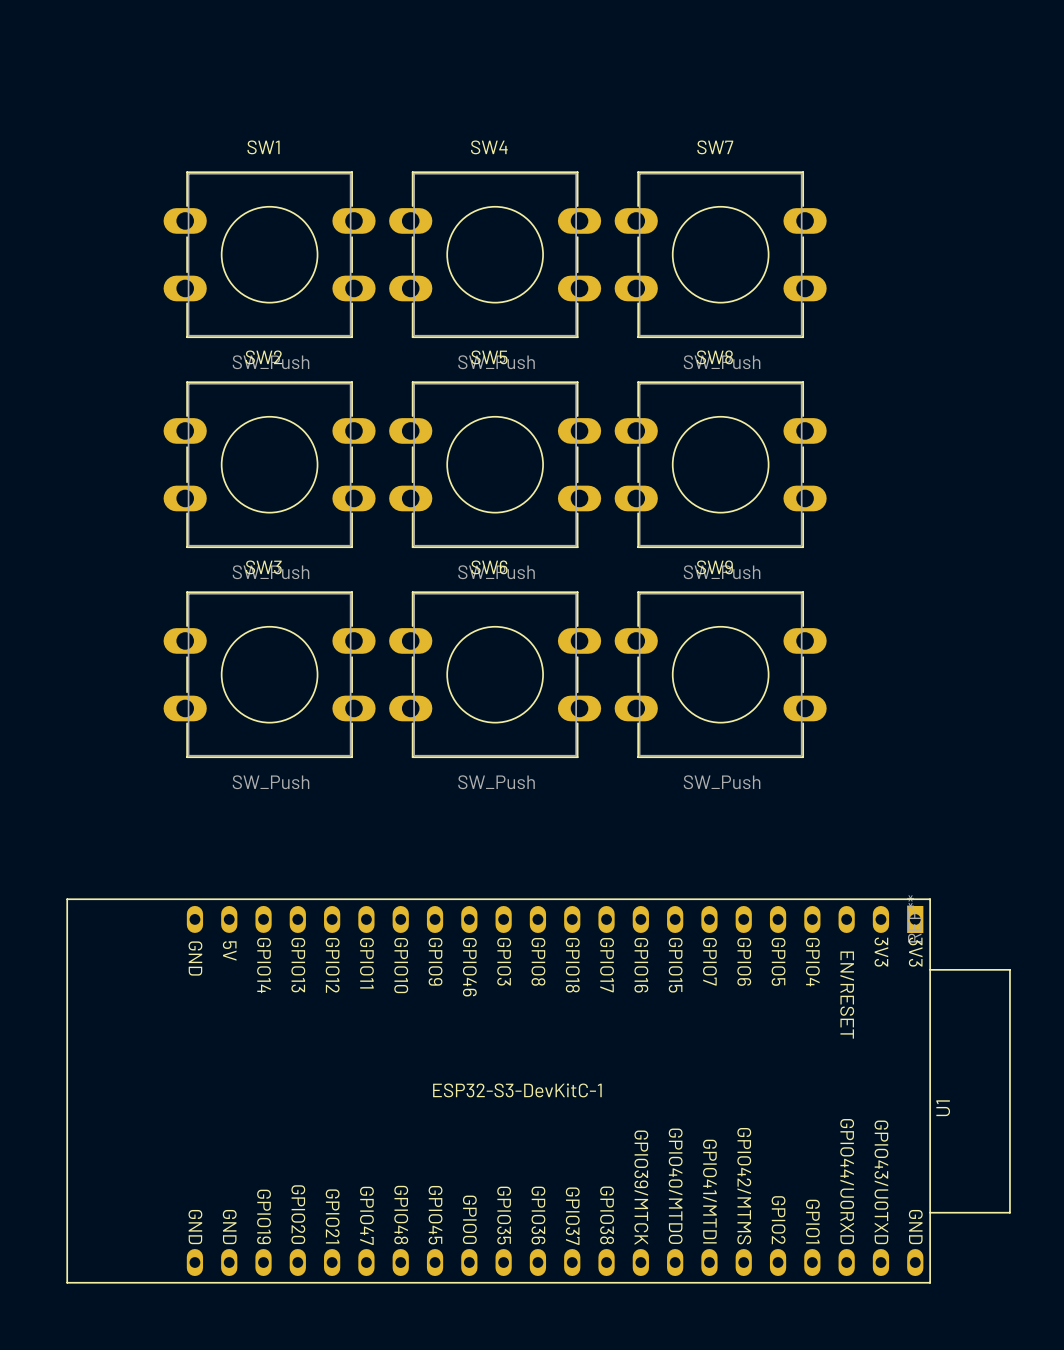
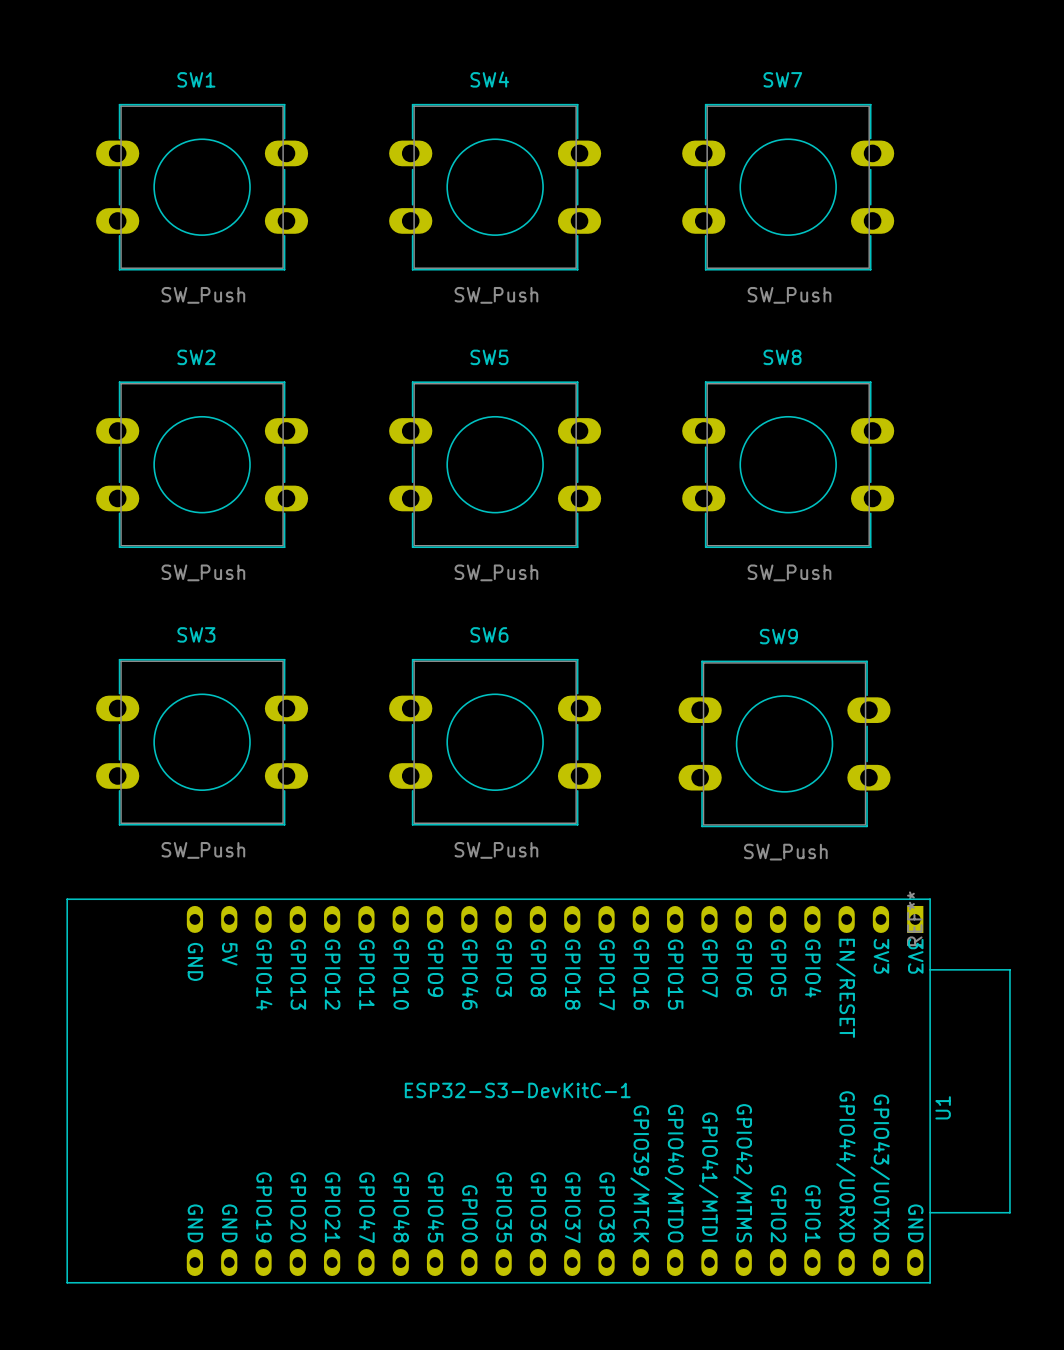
SW1 position: (269, 254) -> (202, 187)
SW4 position: (495, 254) -> (495, 187)
SW7 position: (720, 254) -> (788, 187)
SW2 position: (269, 464) -> (202, 464)
SW8 position: (720, 464) -> (788, 464)
SW3 position: (269, 674) -> (202, 742)
SW6 position: (495, 674) -> (495, 742)
SW9 position: (720, 674) -> (784, 743)

